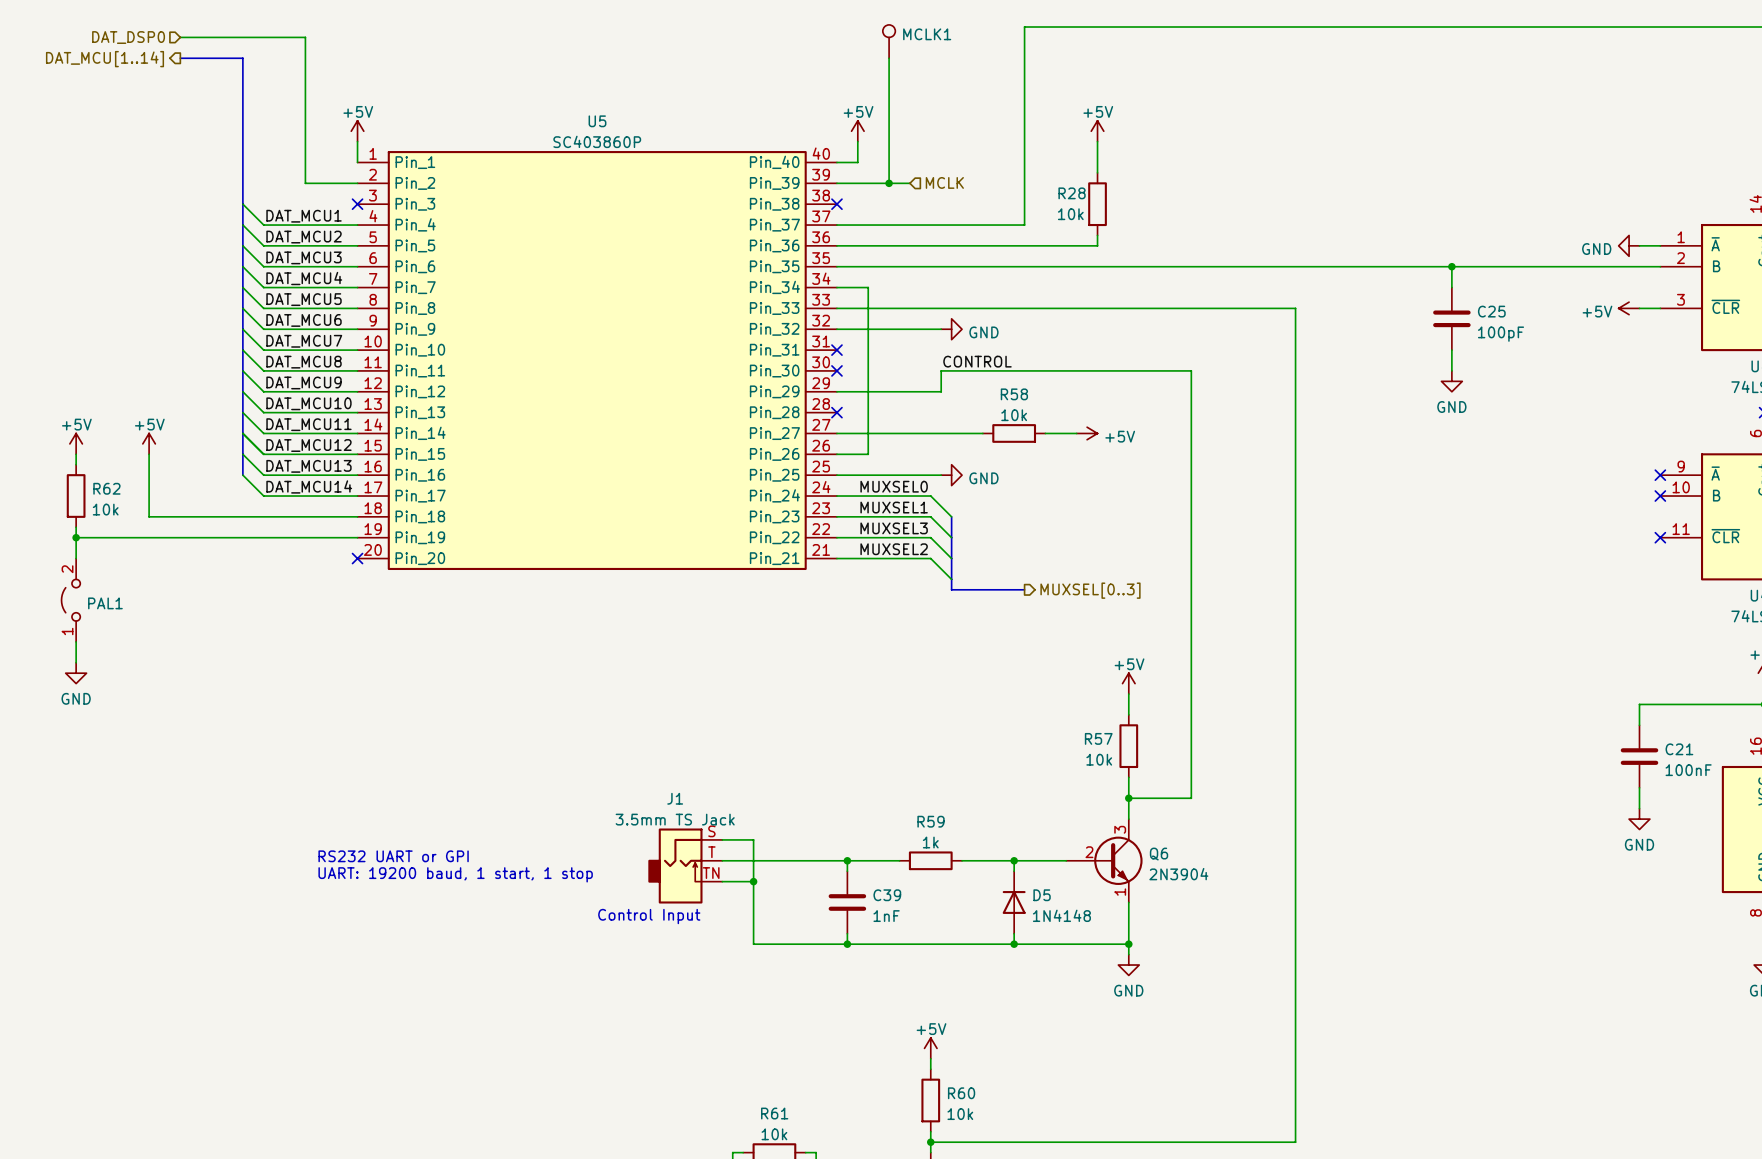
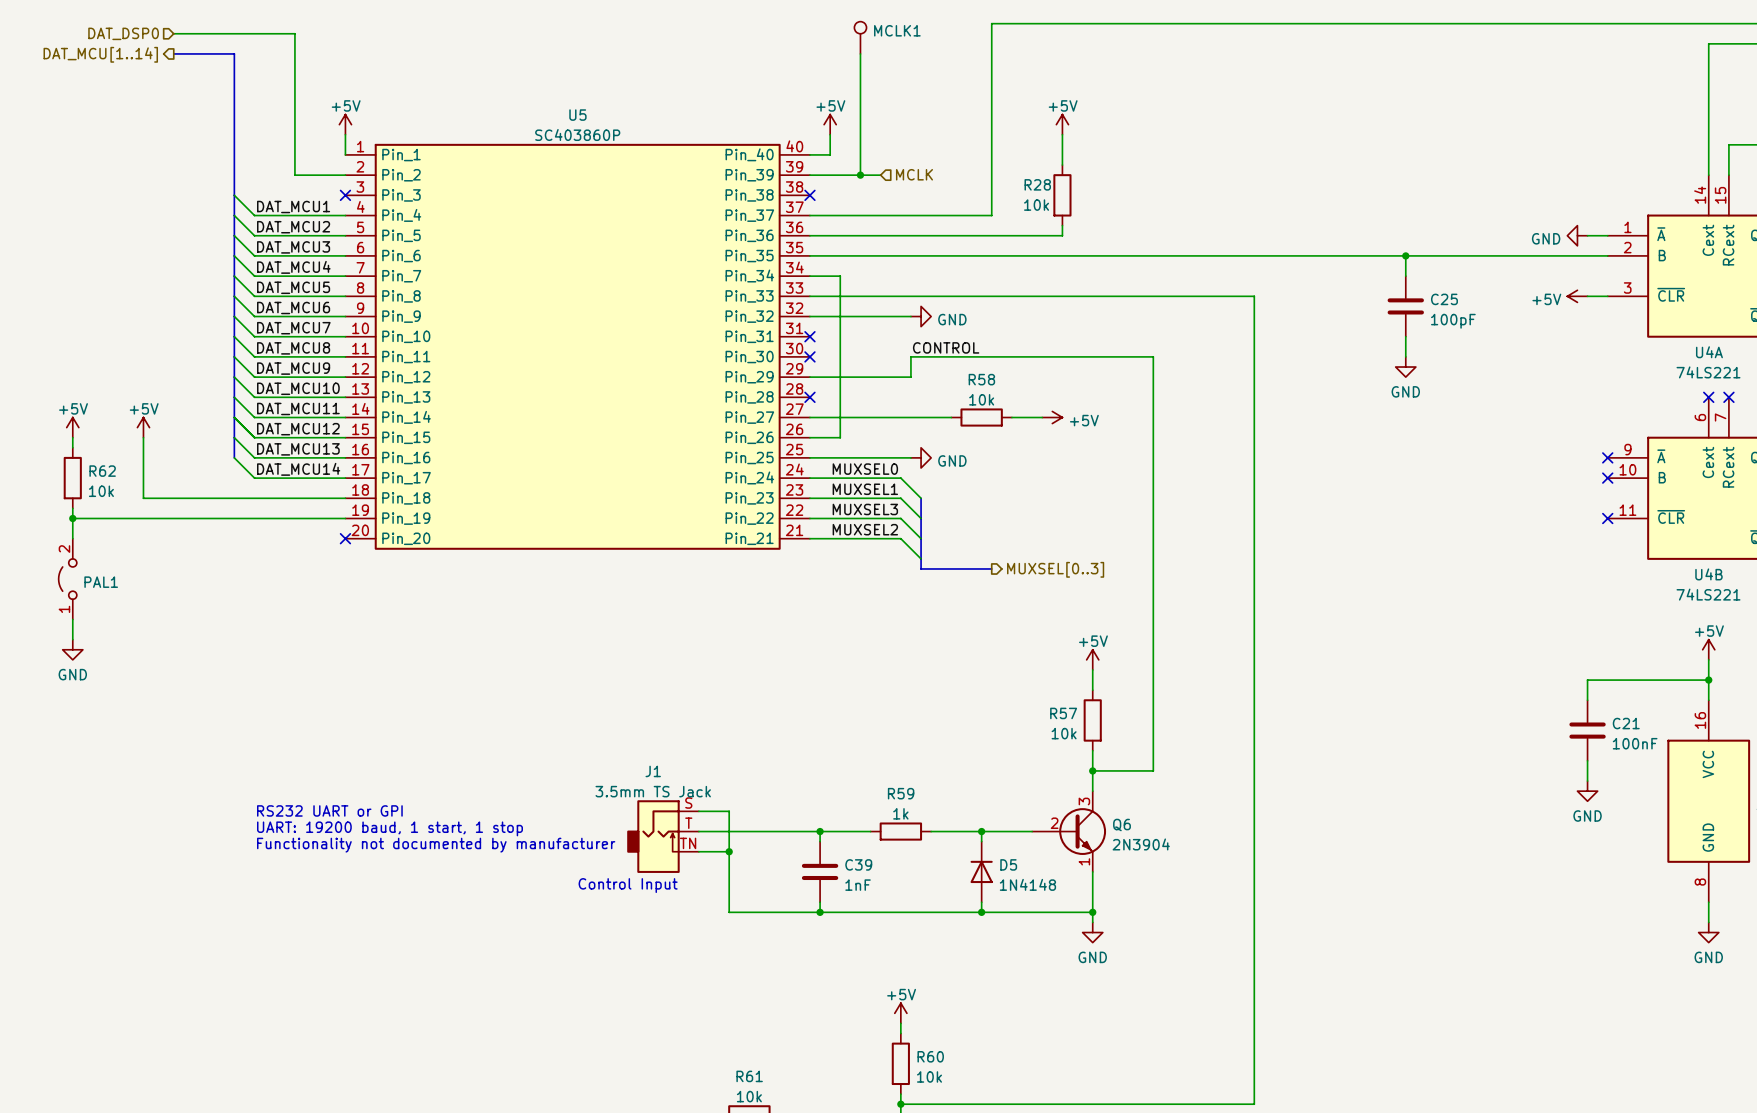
text position: RS232 UART or GPI (393, 856) -> RS232 UART or GPI (329, 810)
text: none -> Functionality not documented by manufacturer (436, 845)
text position: UART: 19200 baud, 1 start, 1 stop (455, 874) -> UART: 19200 baud, 1 start, 1 stop (390, 828)

